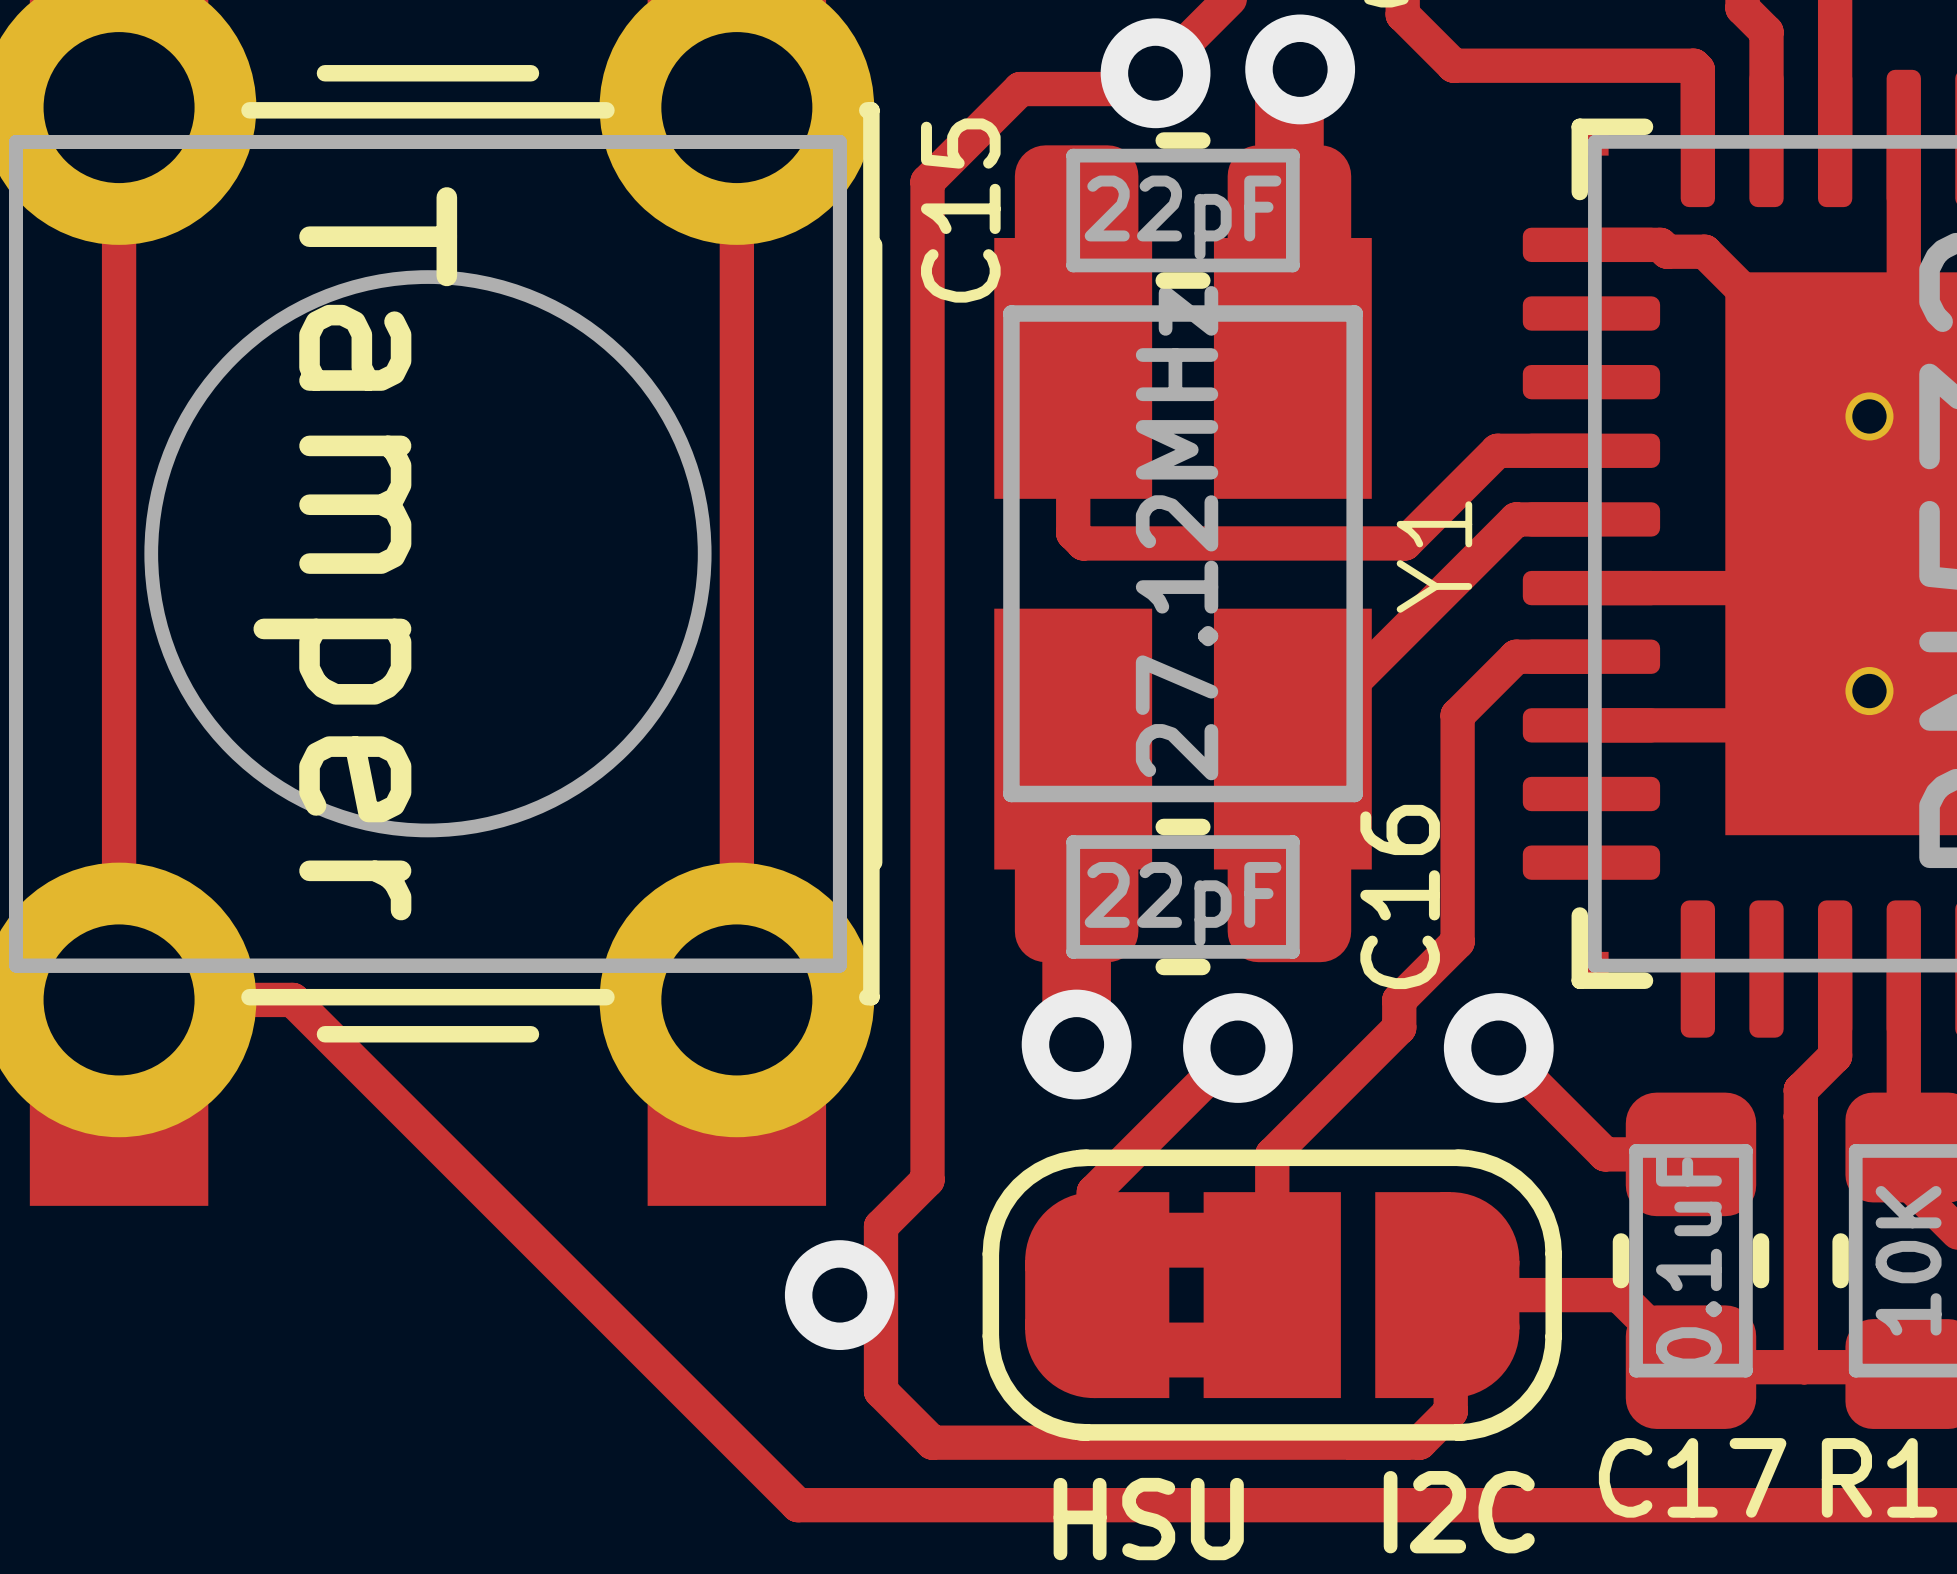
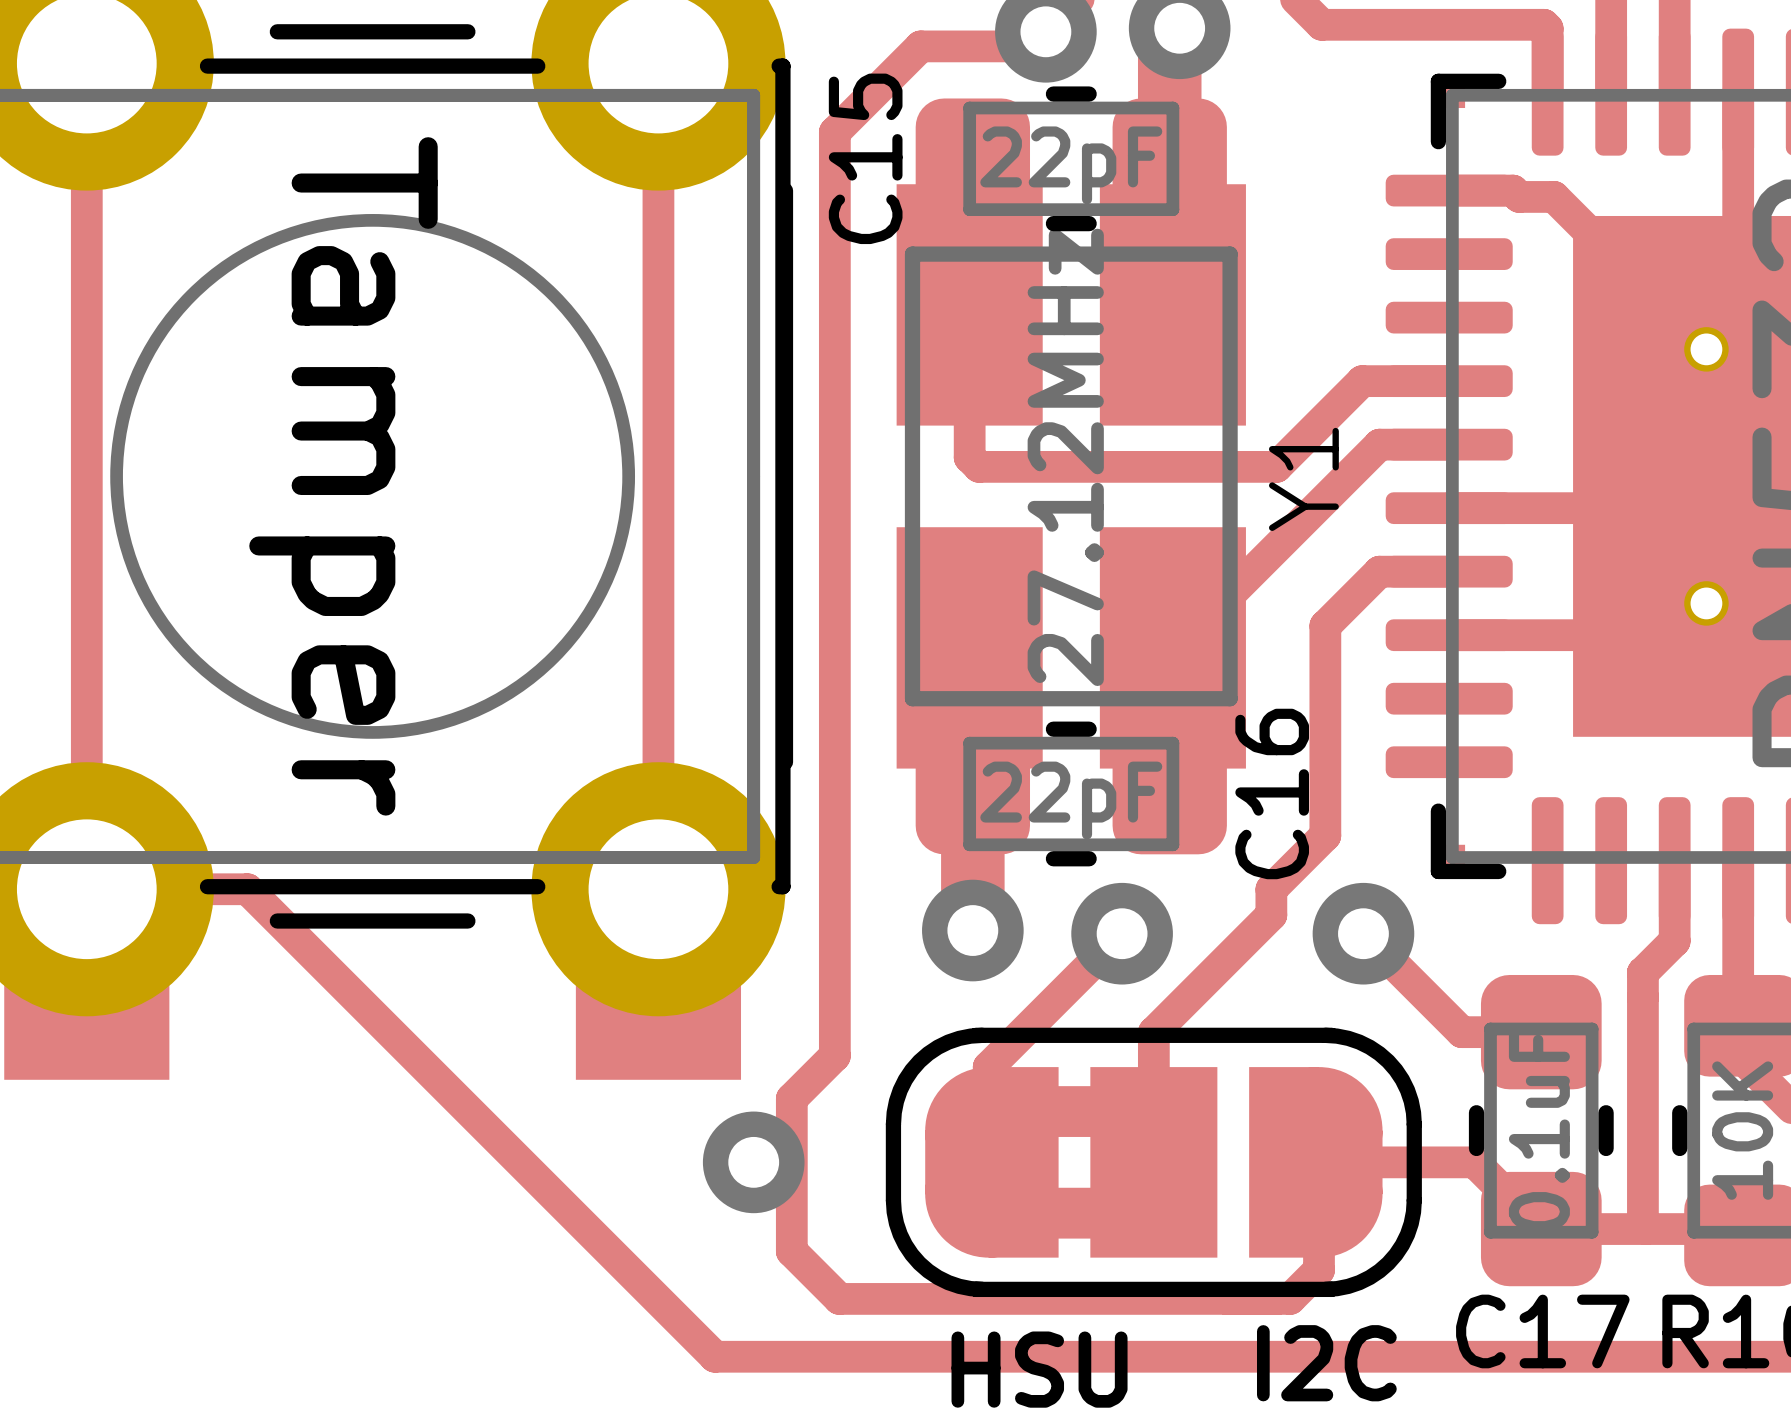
text position: Tamper (355, 553) -> Tamper (343, 476)

